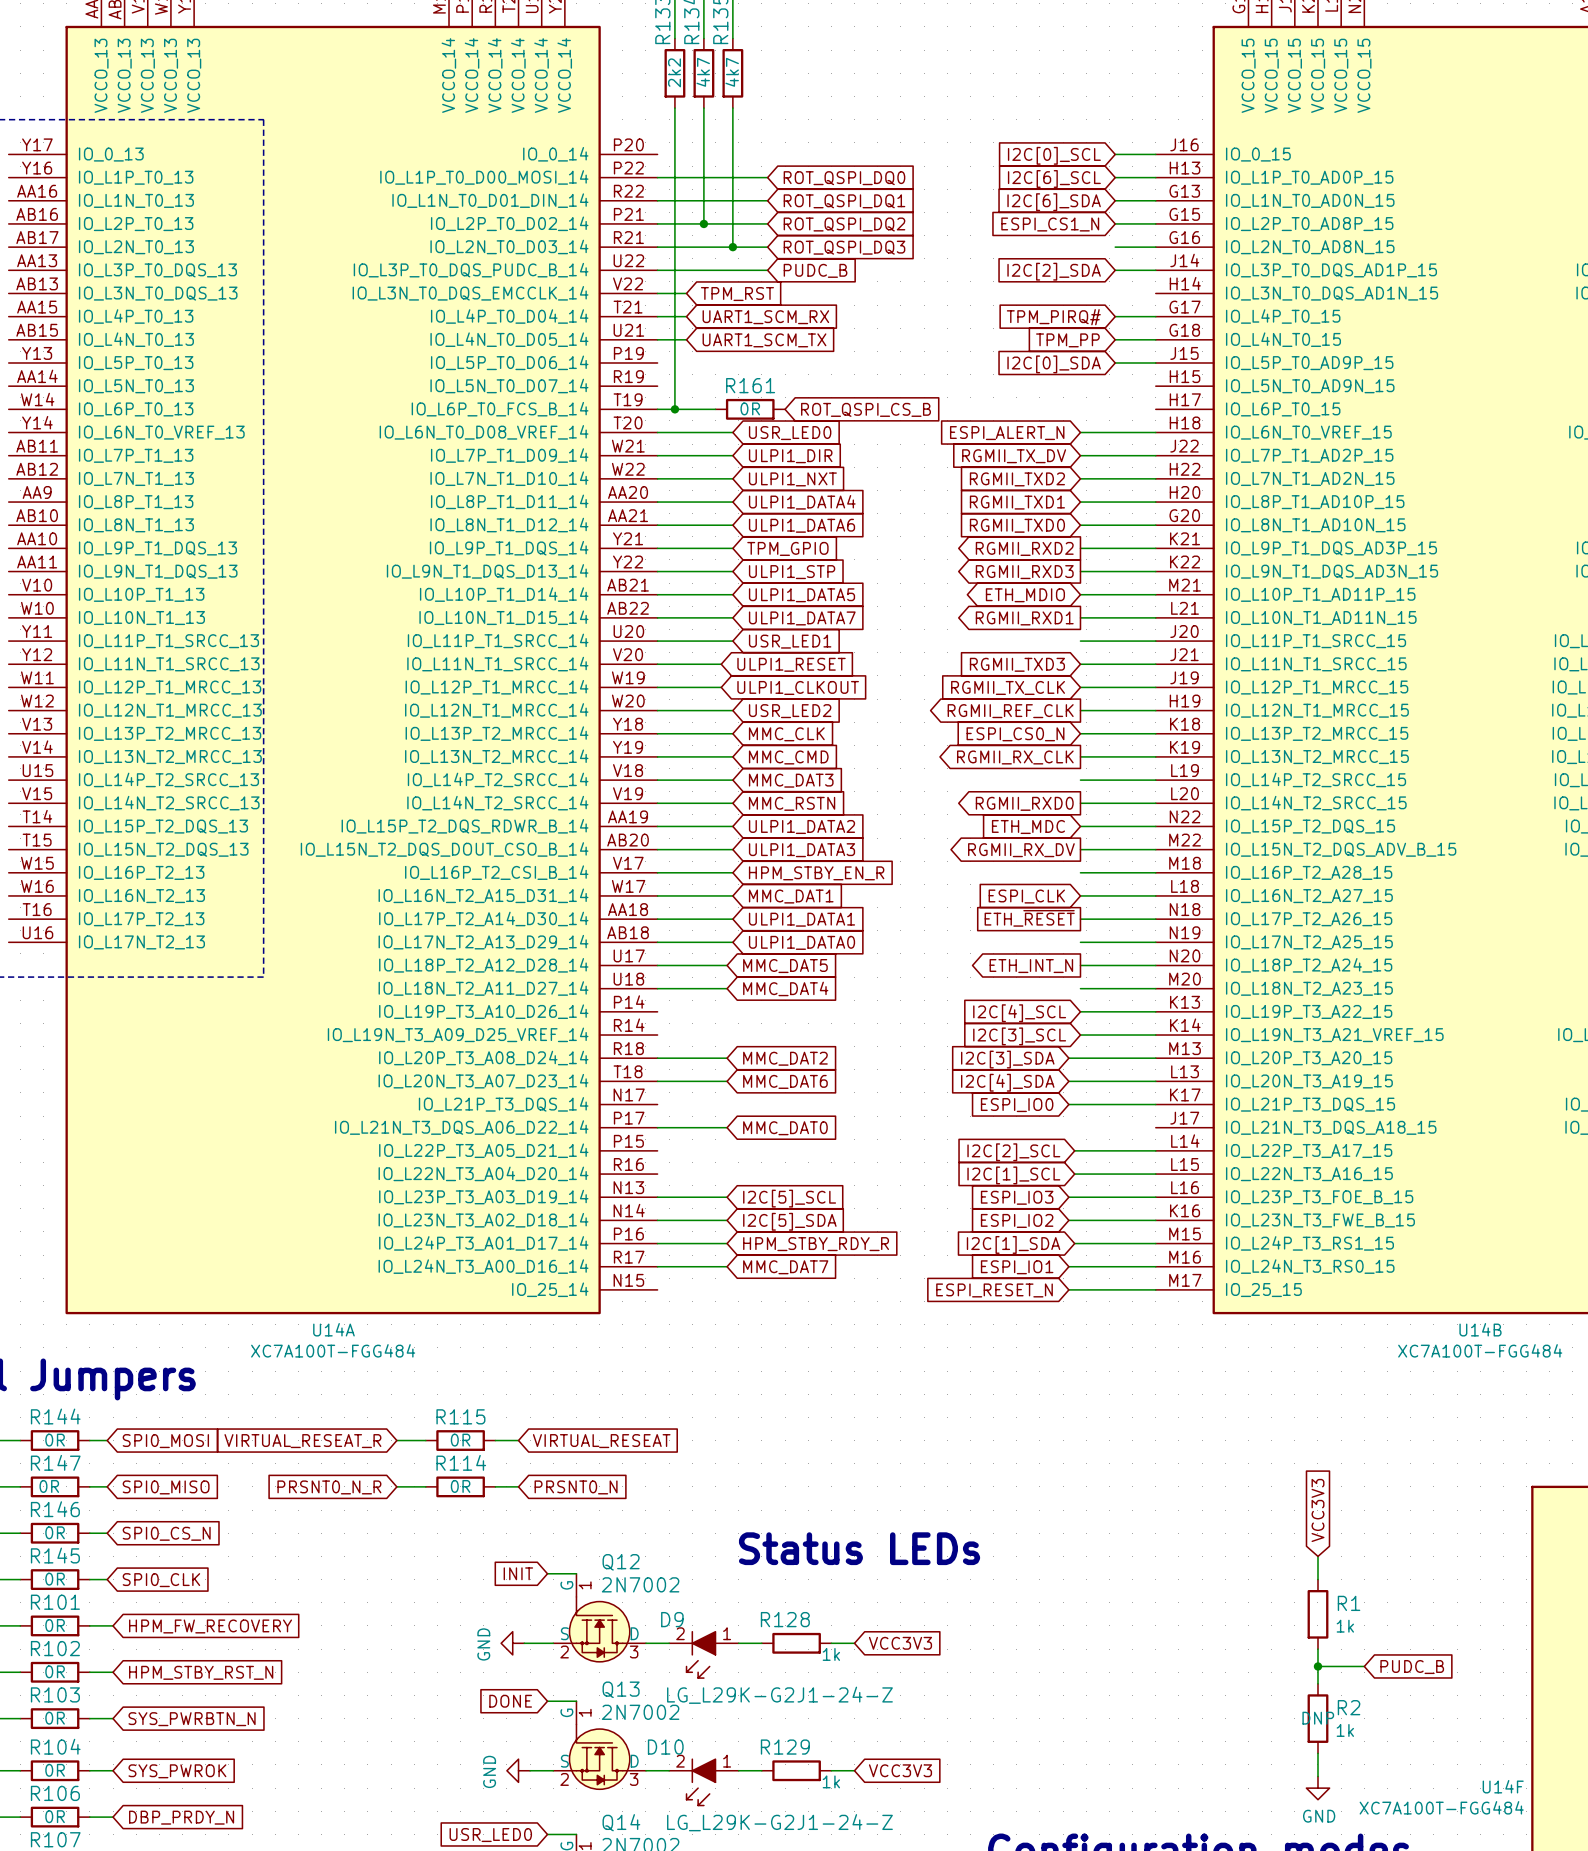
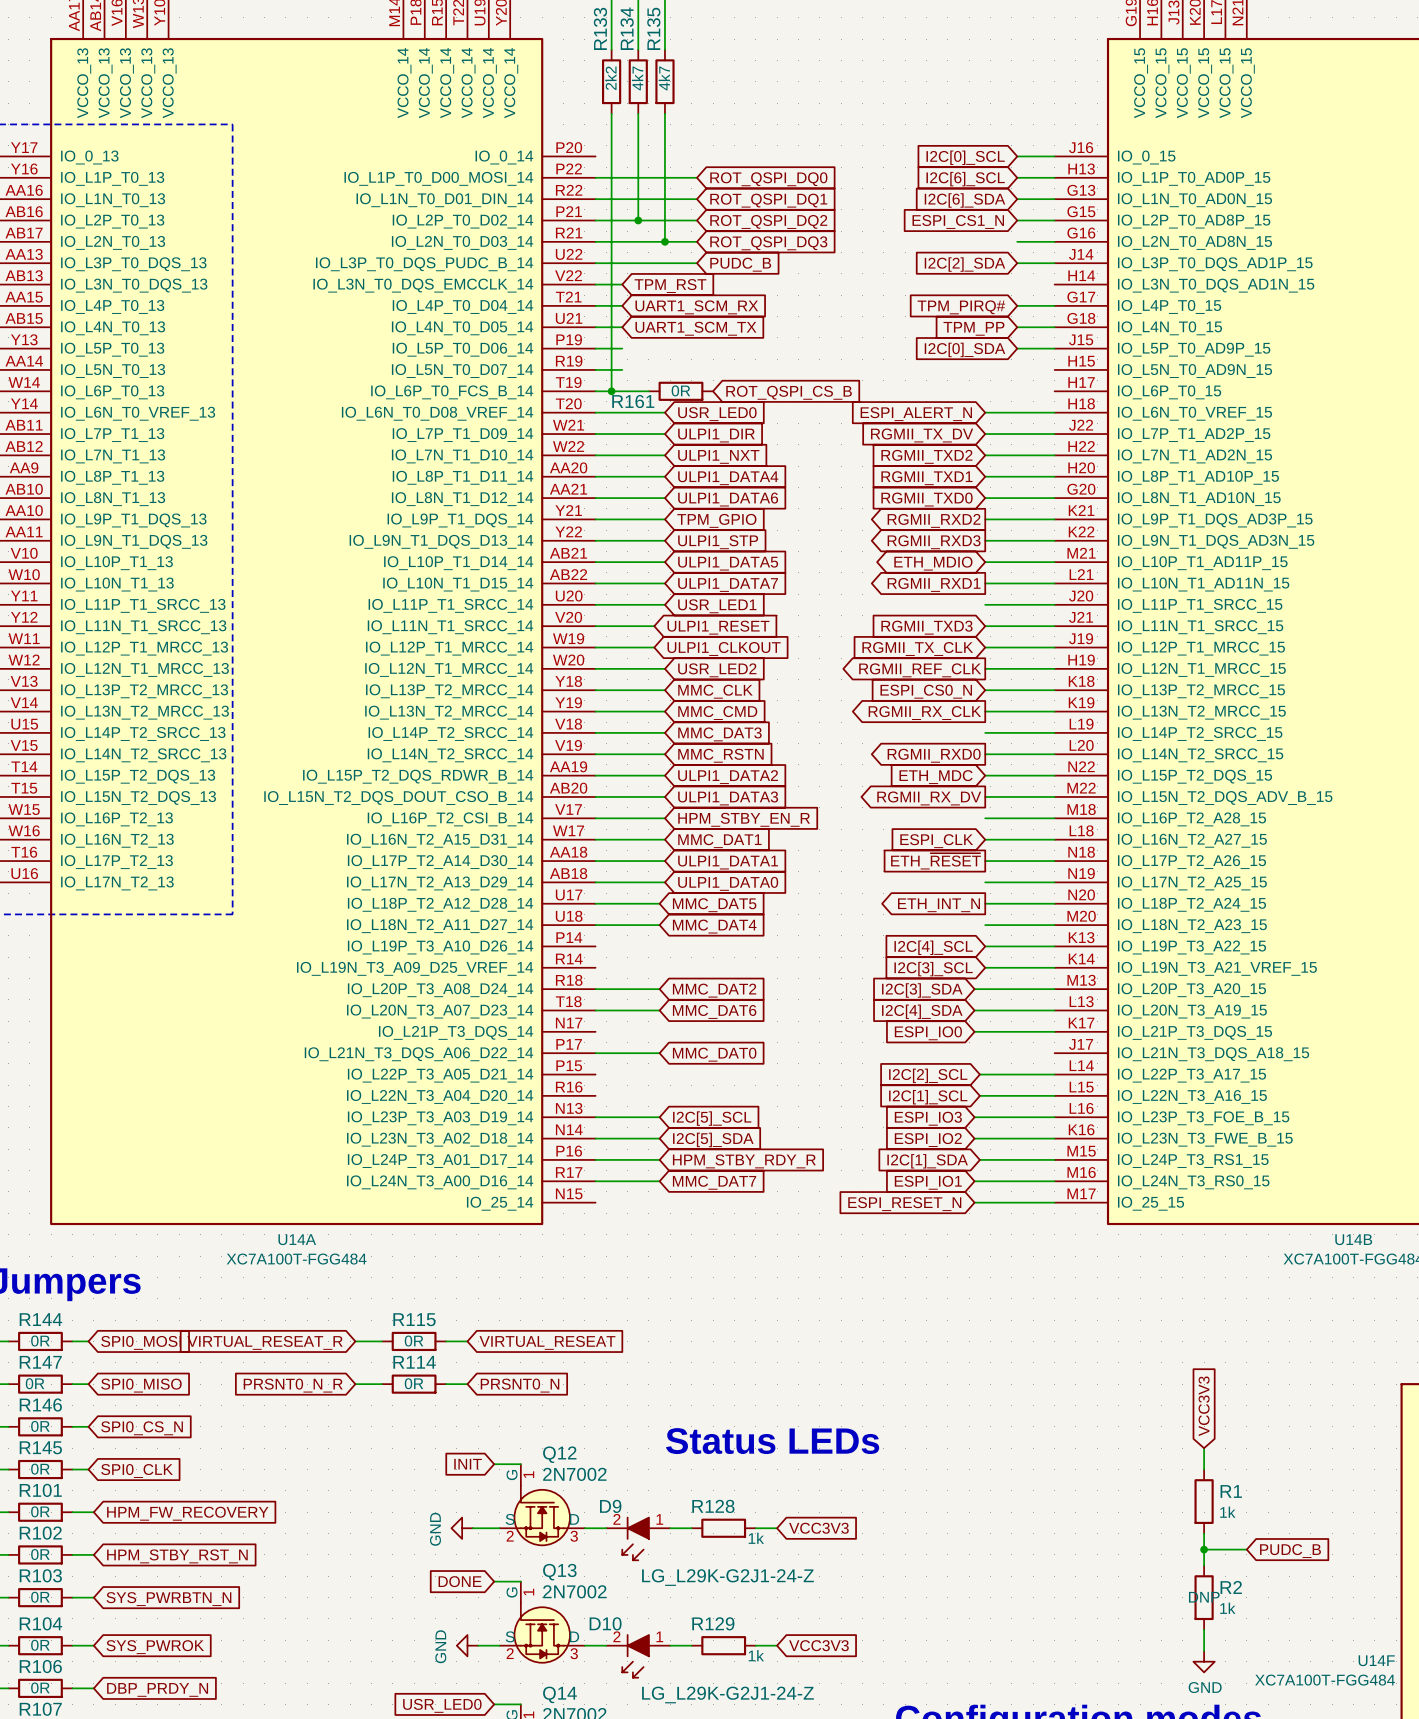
wire: none -> (595, 348) (622, 348)
R161 name position: R161 (750, 385) -> R161 (633, 401)
wire: none -> (595, 369) (622, 369)

